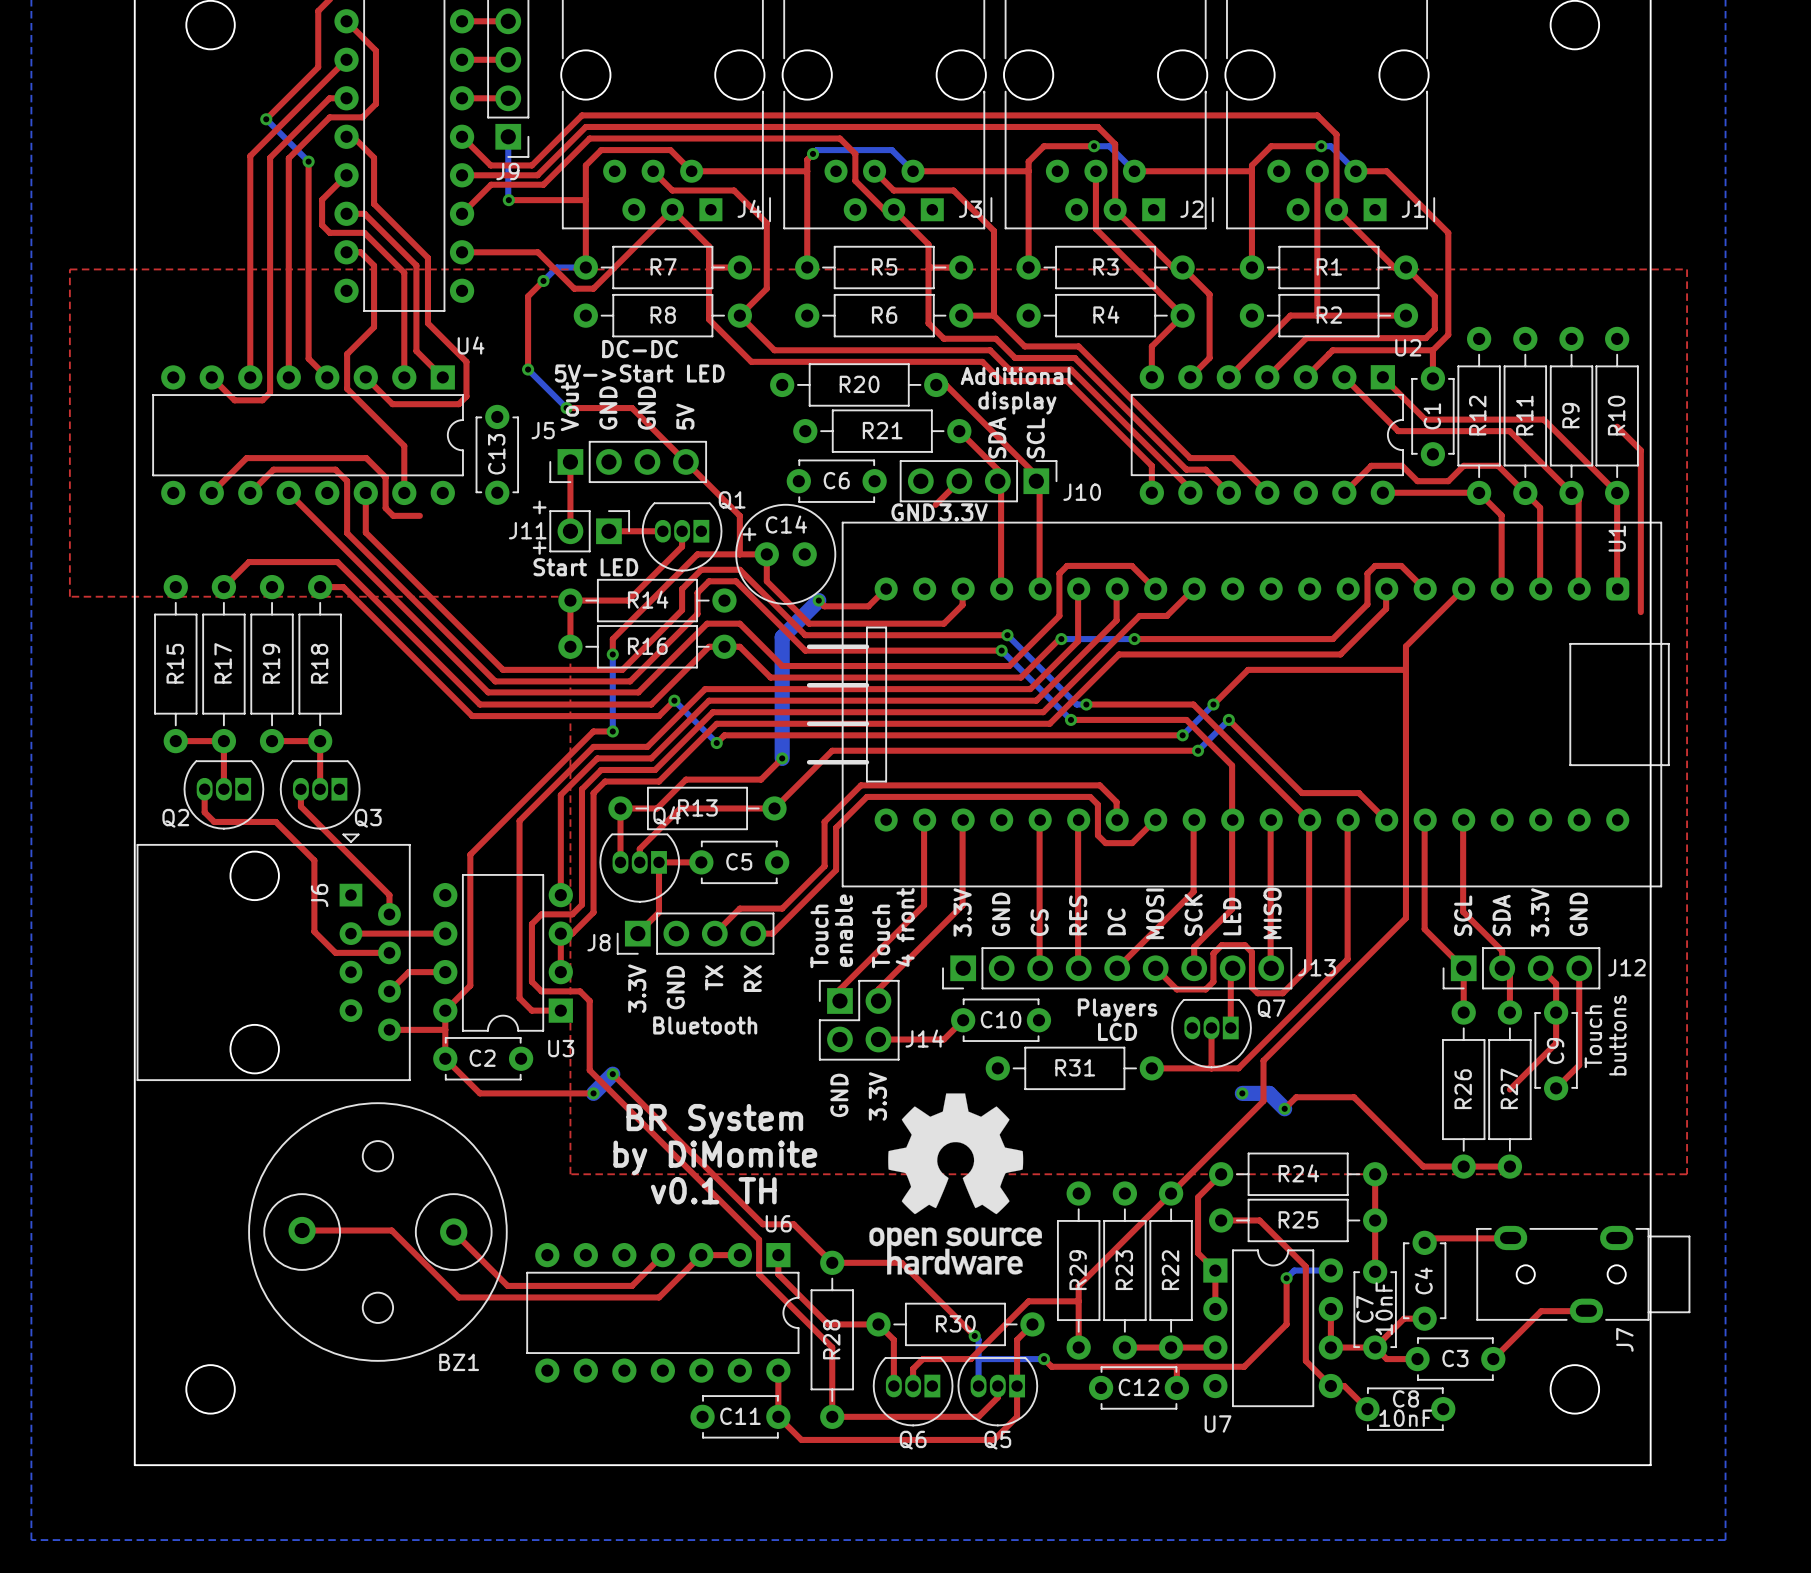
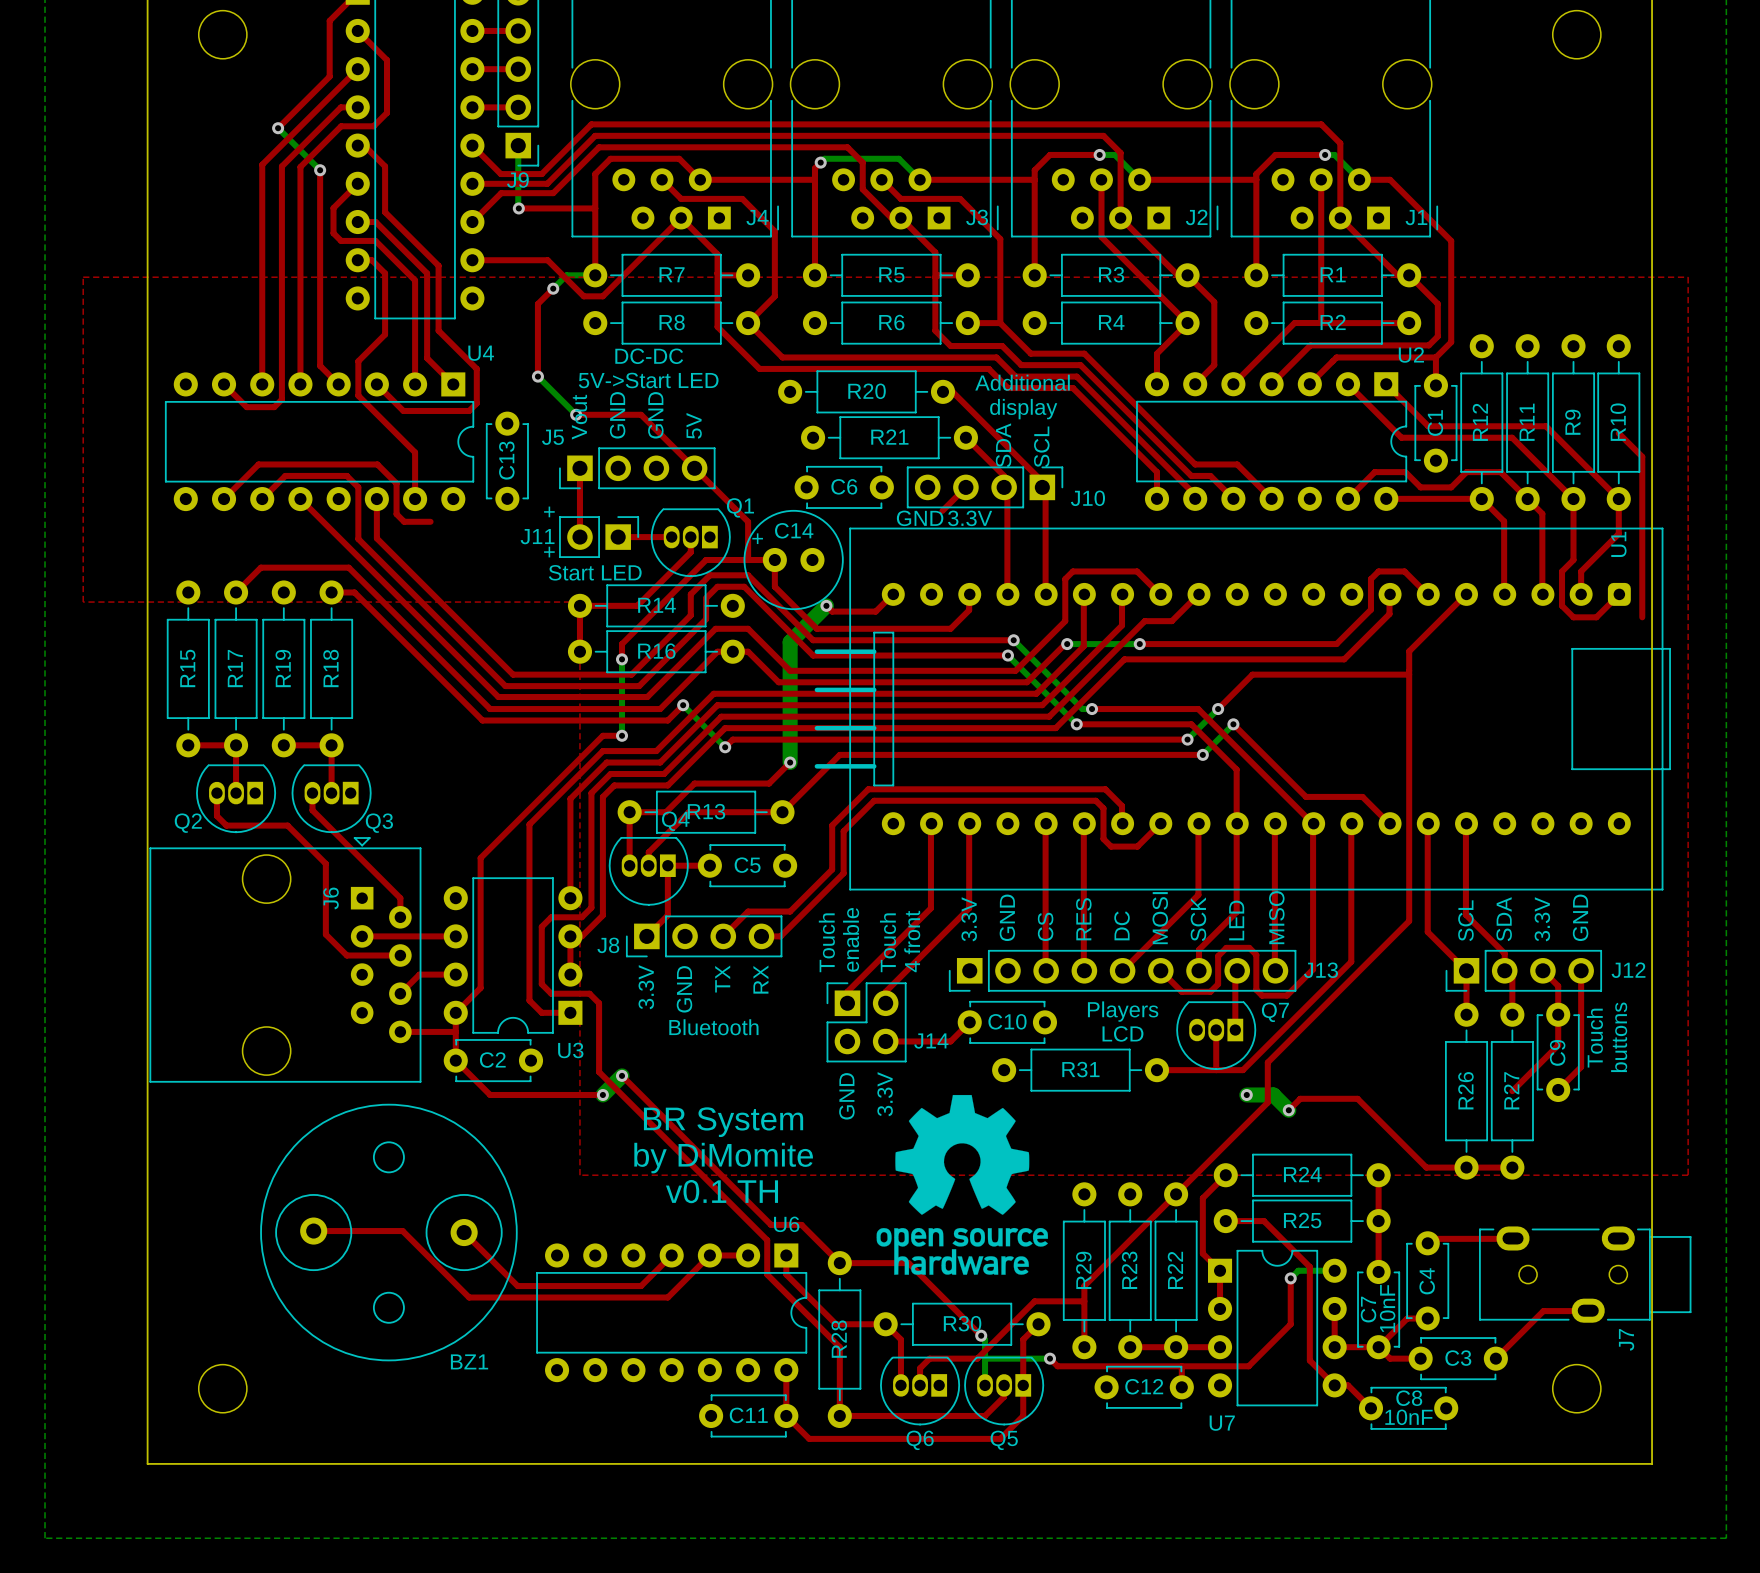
top track: (1571, 492) (1578, 500) (1578, 589) -> (1573, 499) (1573, 560) (1562, 571) (1562, 605) (1573, 617) (1596, 617) (1619, 594)
top track: (1617, 527) (1617, 589) -> (1618, 533) (1581, 571) (1581, 594)

